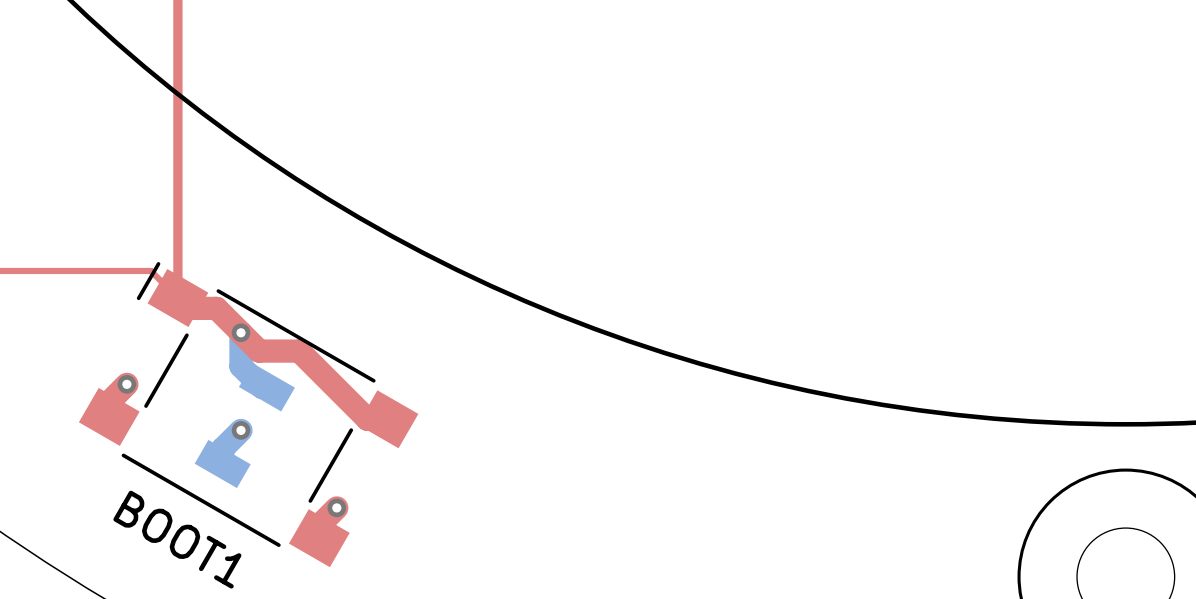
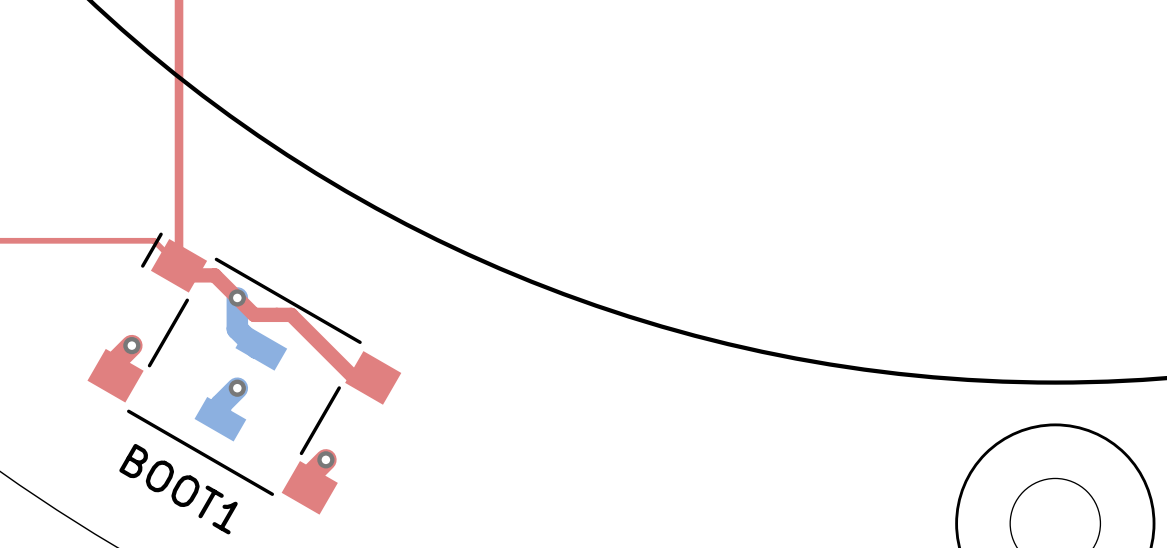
top track width: thick (177, 298) (188, 308) (216, 308) (259, 351) (299, 351) (367, 419) (387, 419) -> thin (179, 265) (188, 275) (214, 275) (254, 314) (291, 314) (354, 377) (373, 377)

